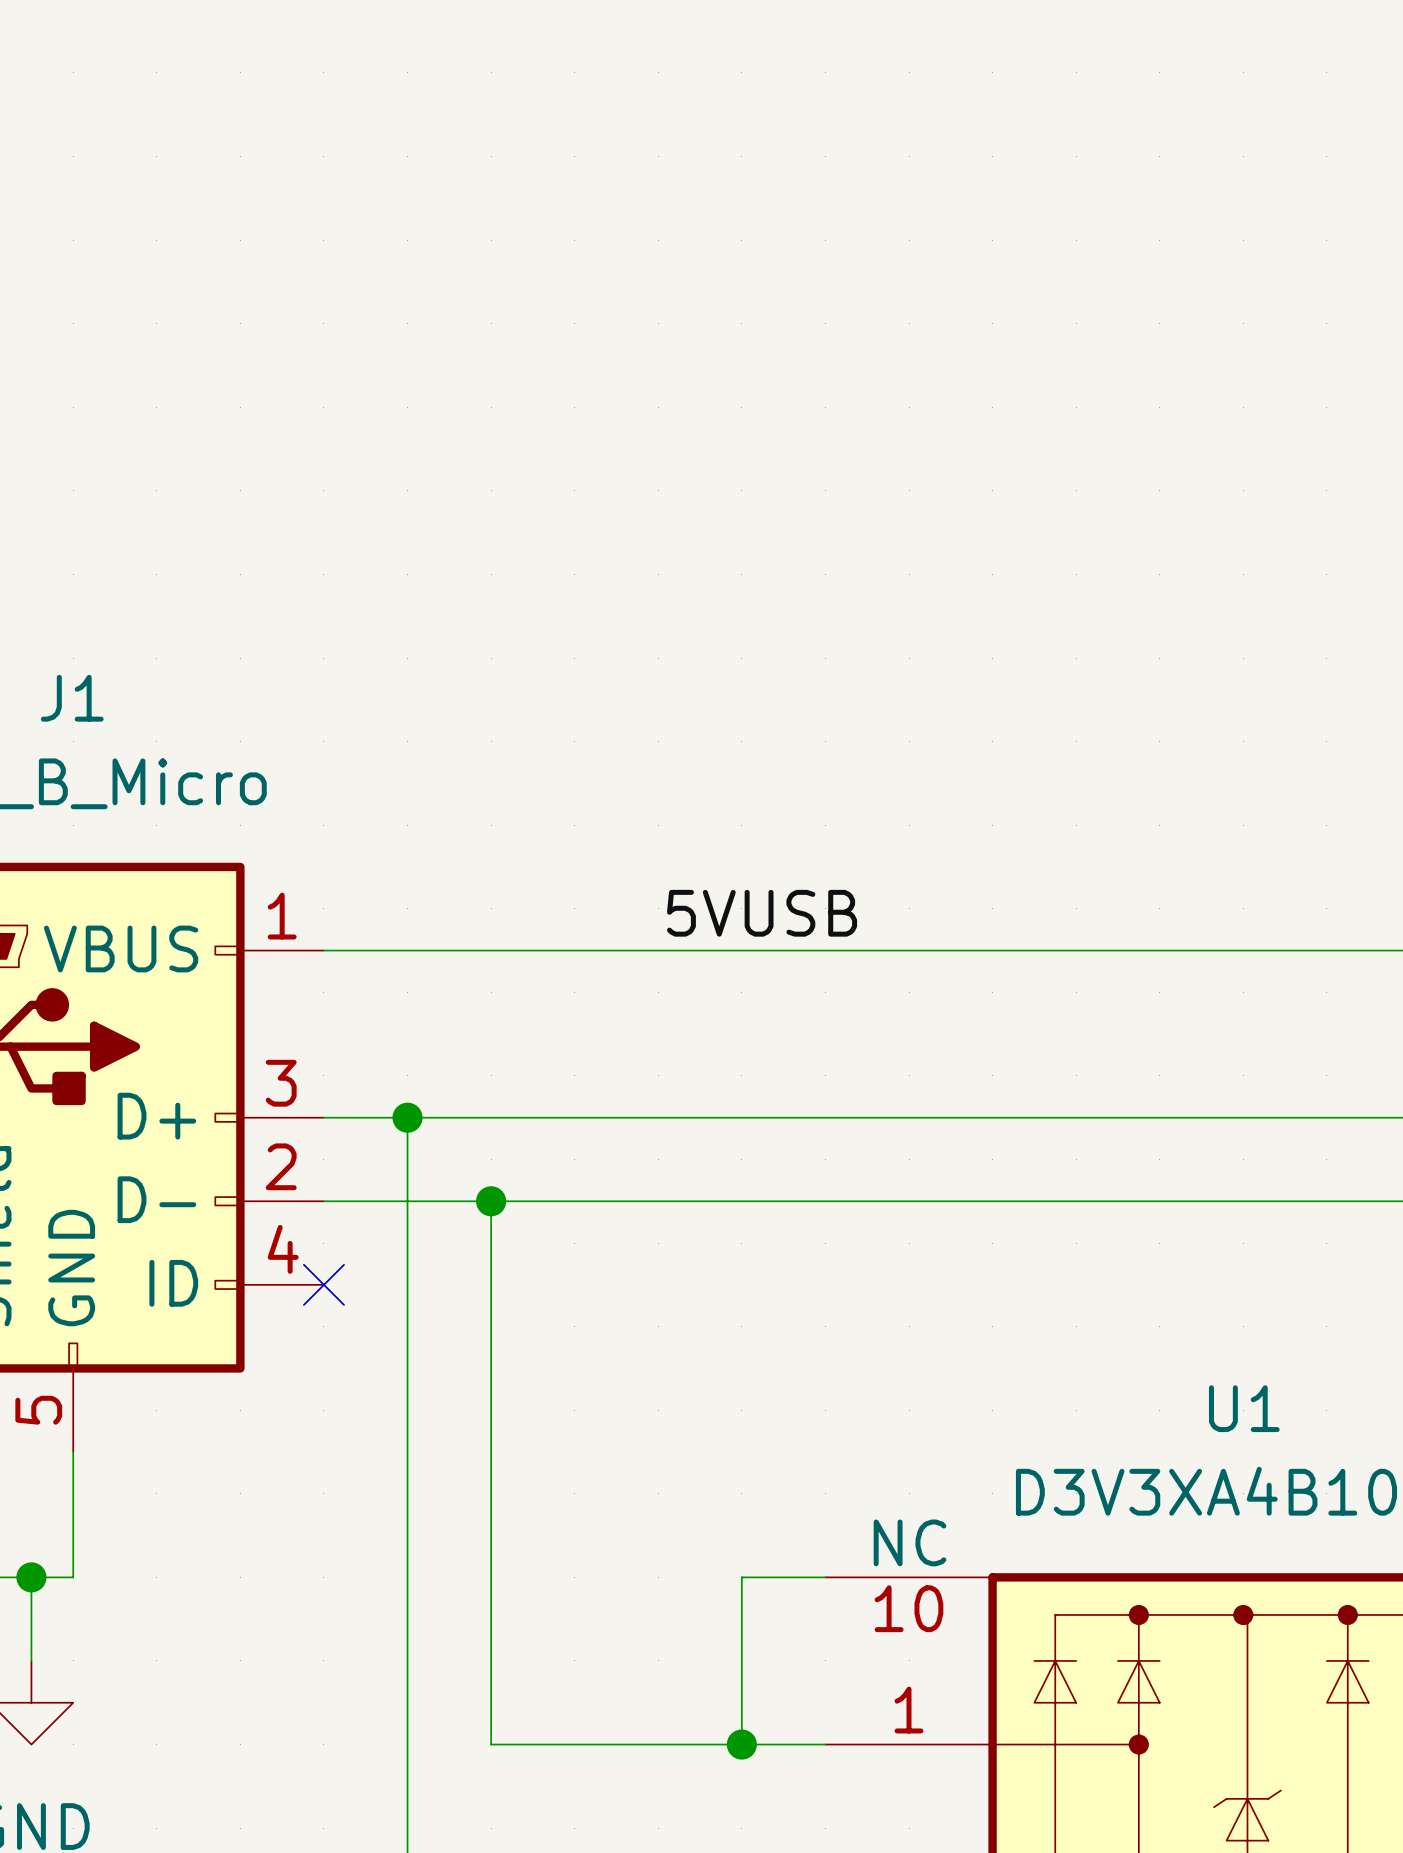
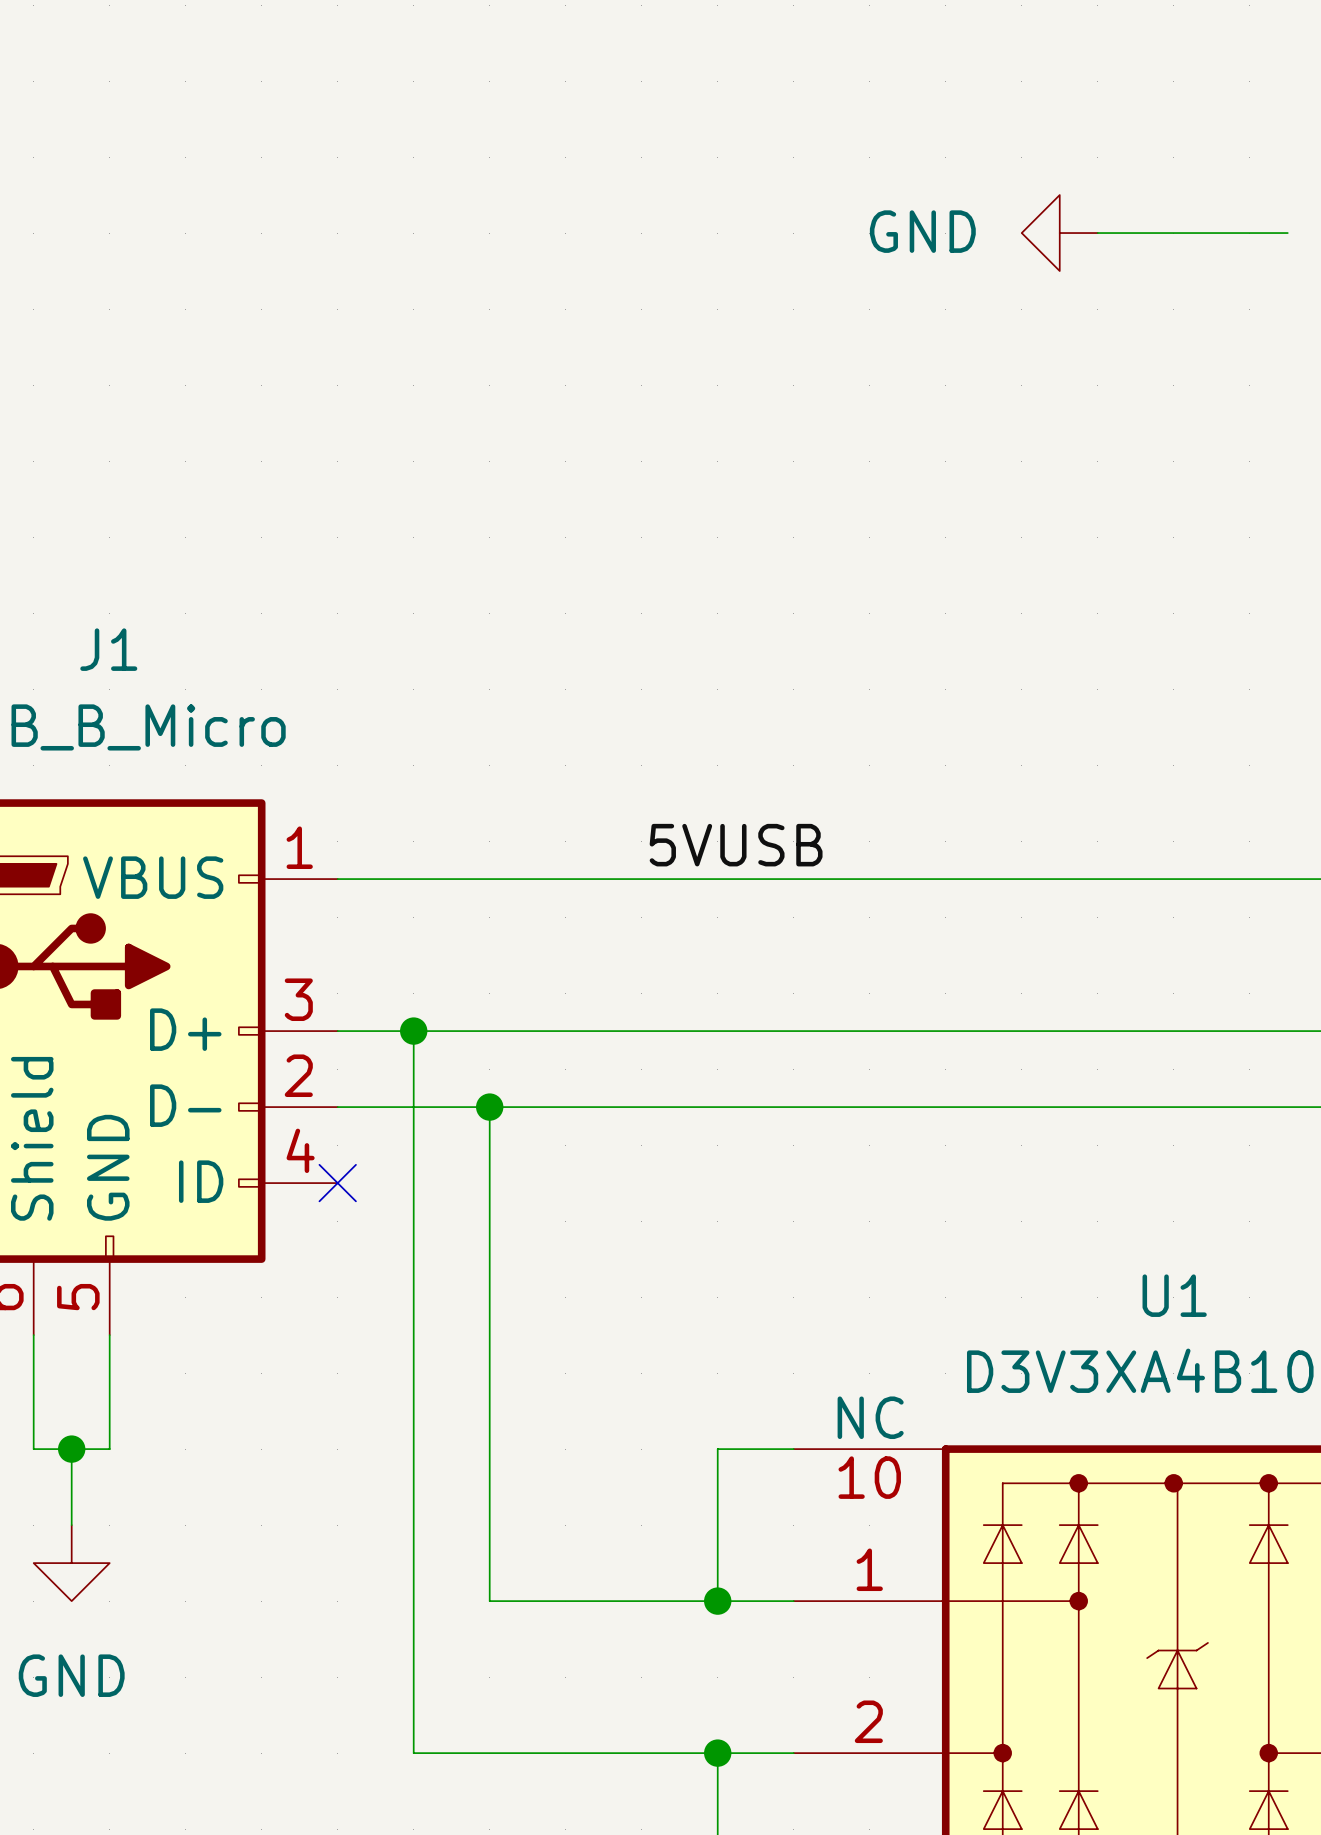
power symbol: none -> GND (1059, 233)
wire: none -> (1097, 233) (1287, 233)

